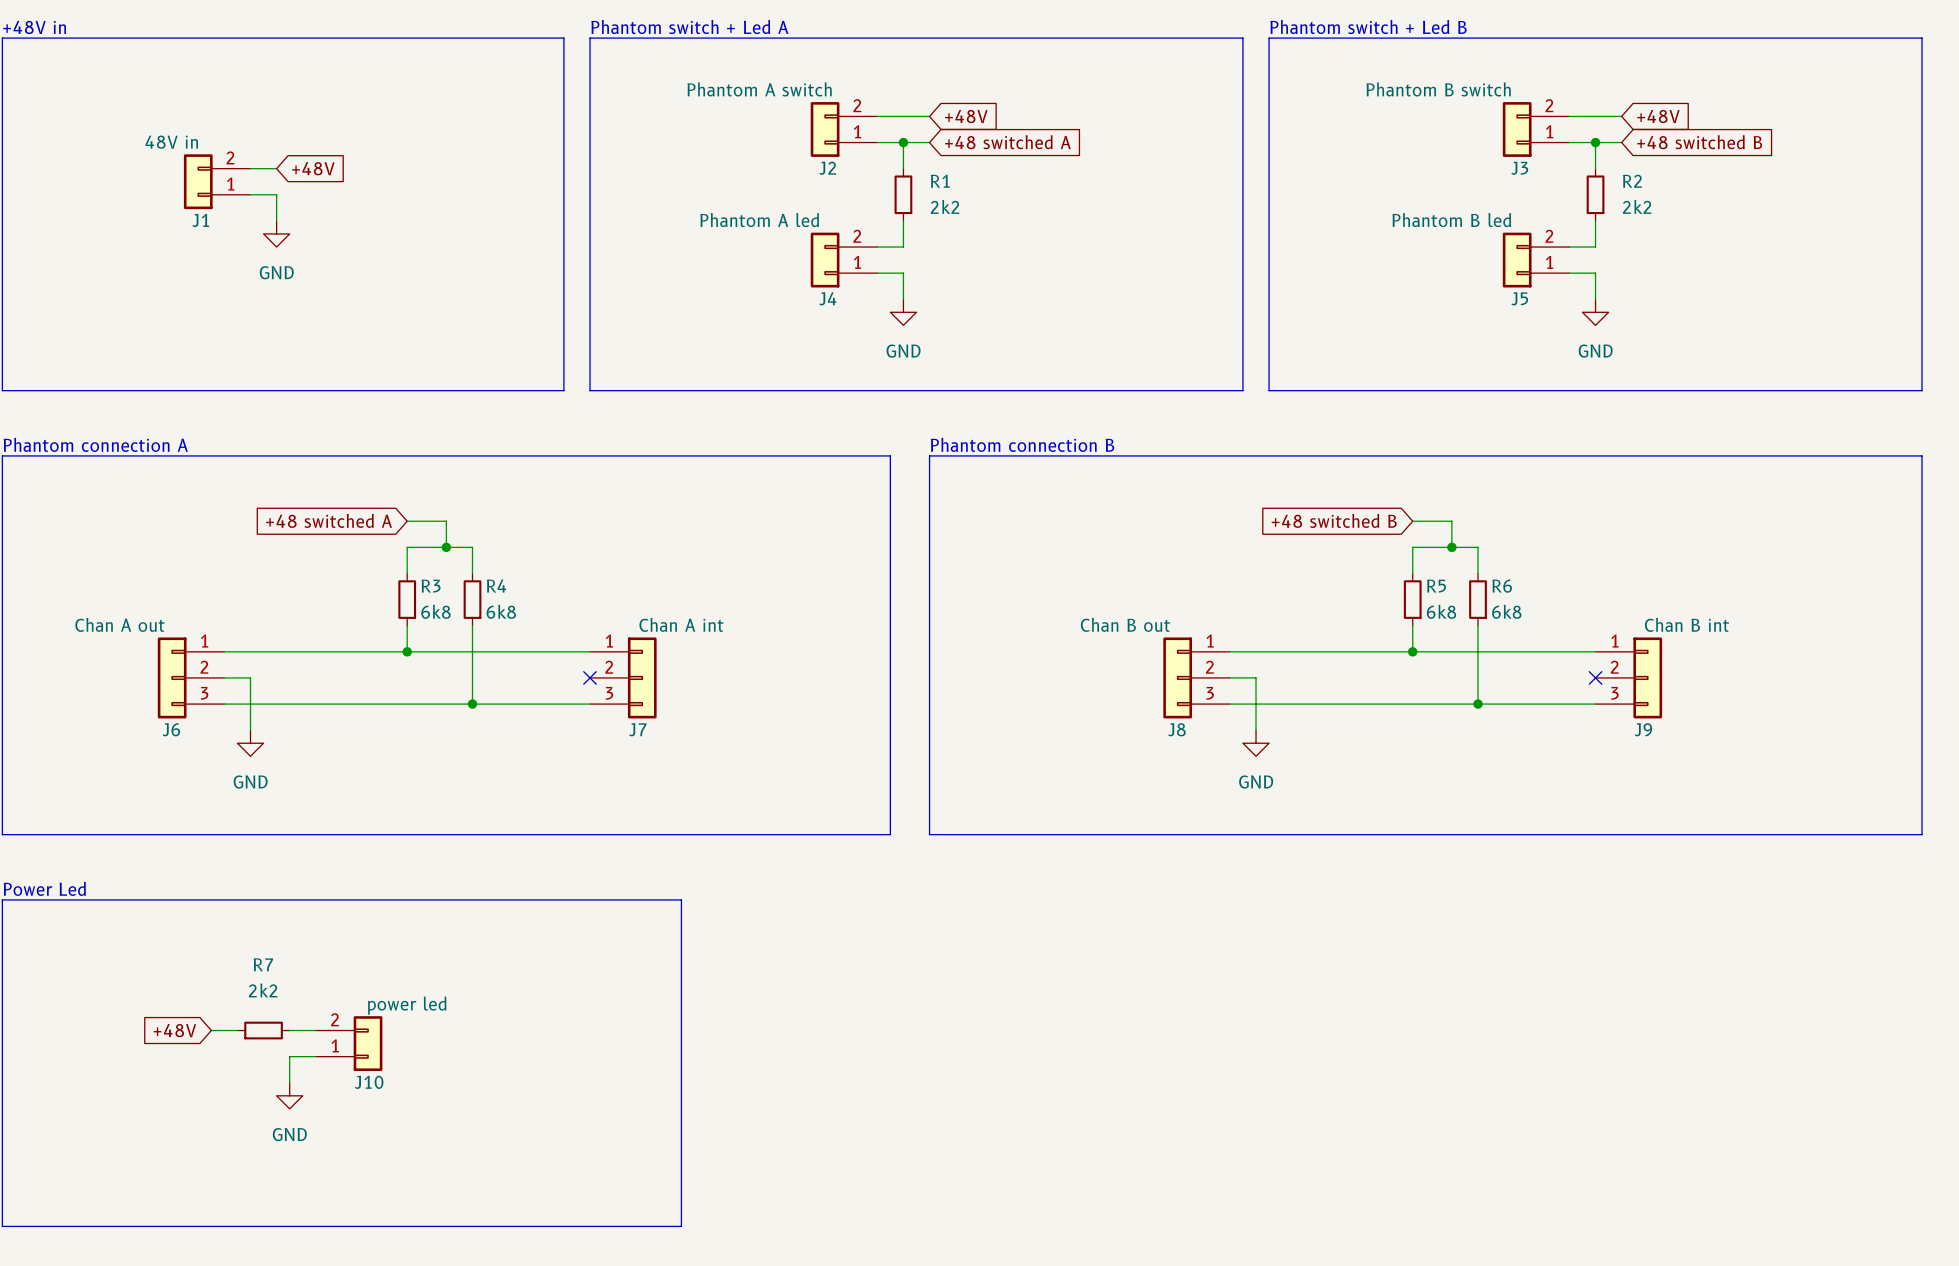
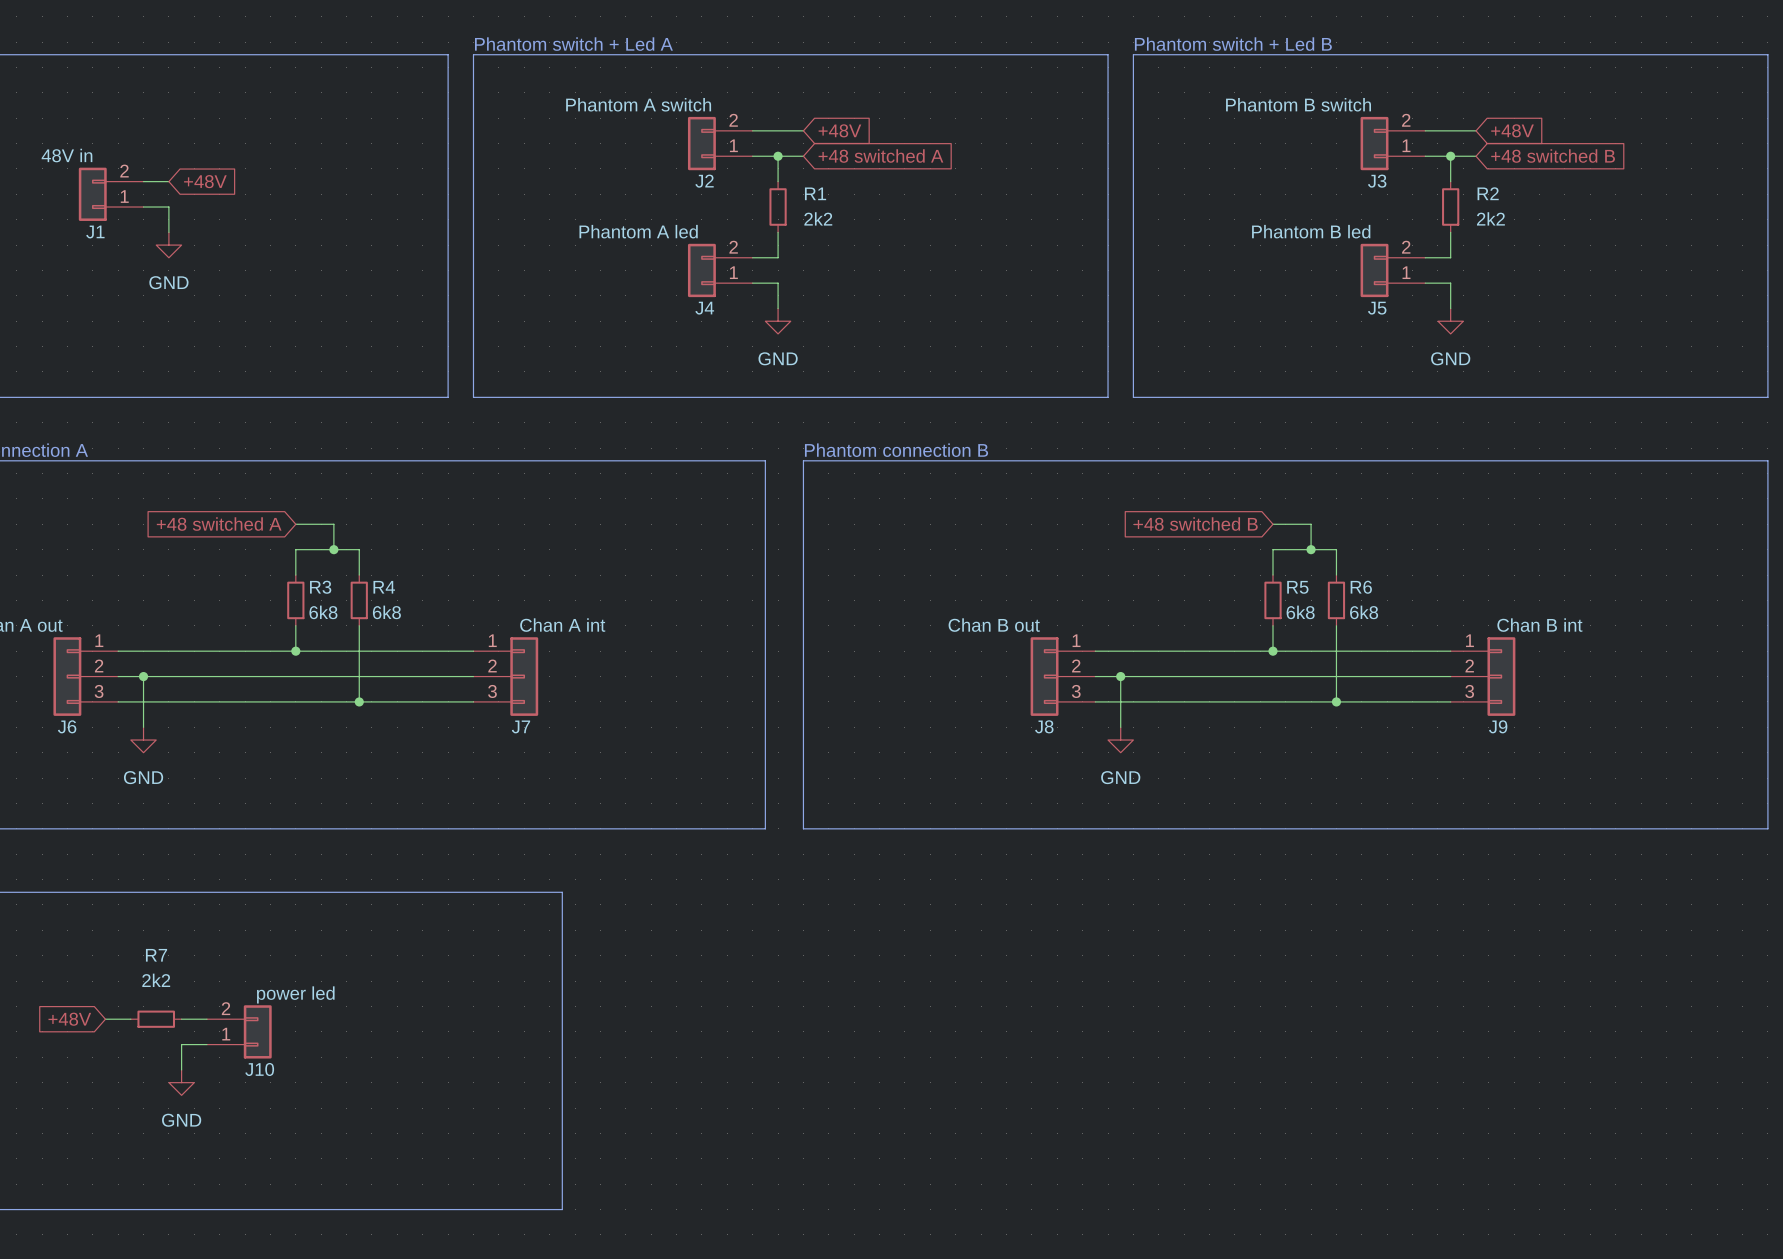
wire: none -> (143, 676) (473, 676)
junction: none -> (143, 676)
no-connect mark: (590, 677) -> none
wire: none -> (1120, 676) (1450, 676)
junction: none -> (1120, 676)
no-connect mark: (1595, 677) -> none

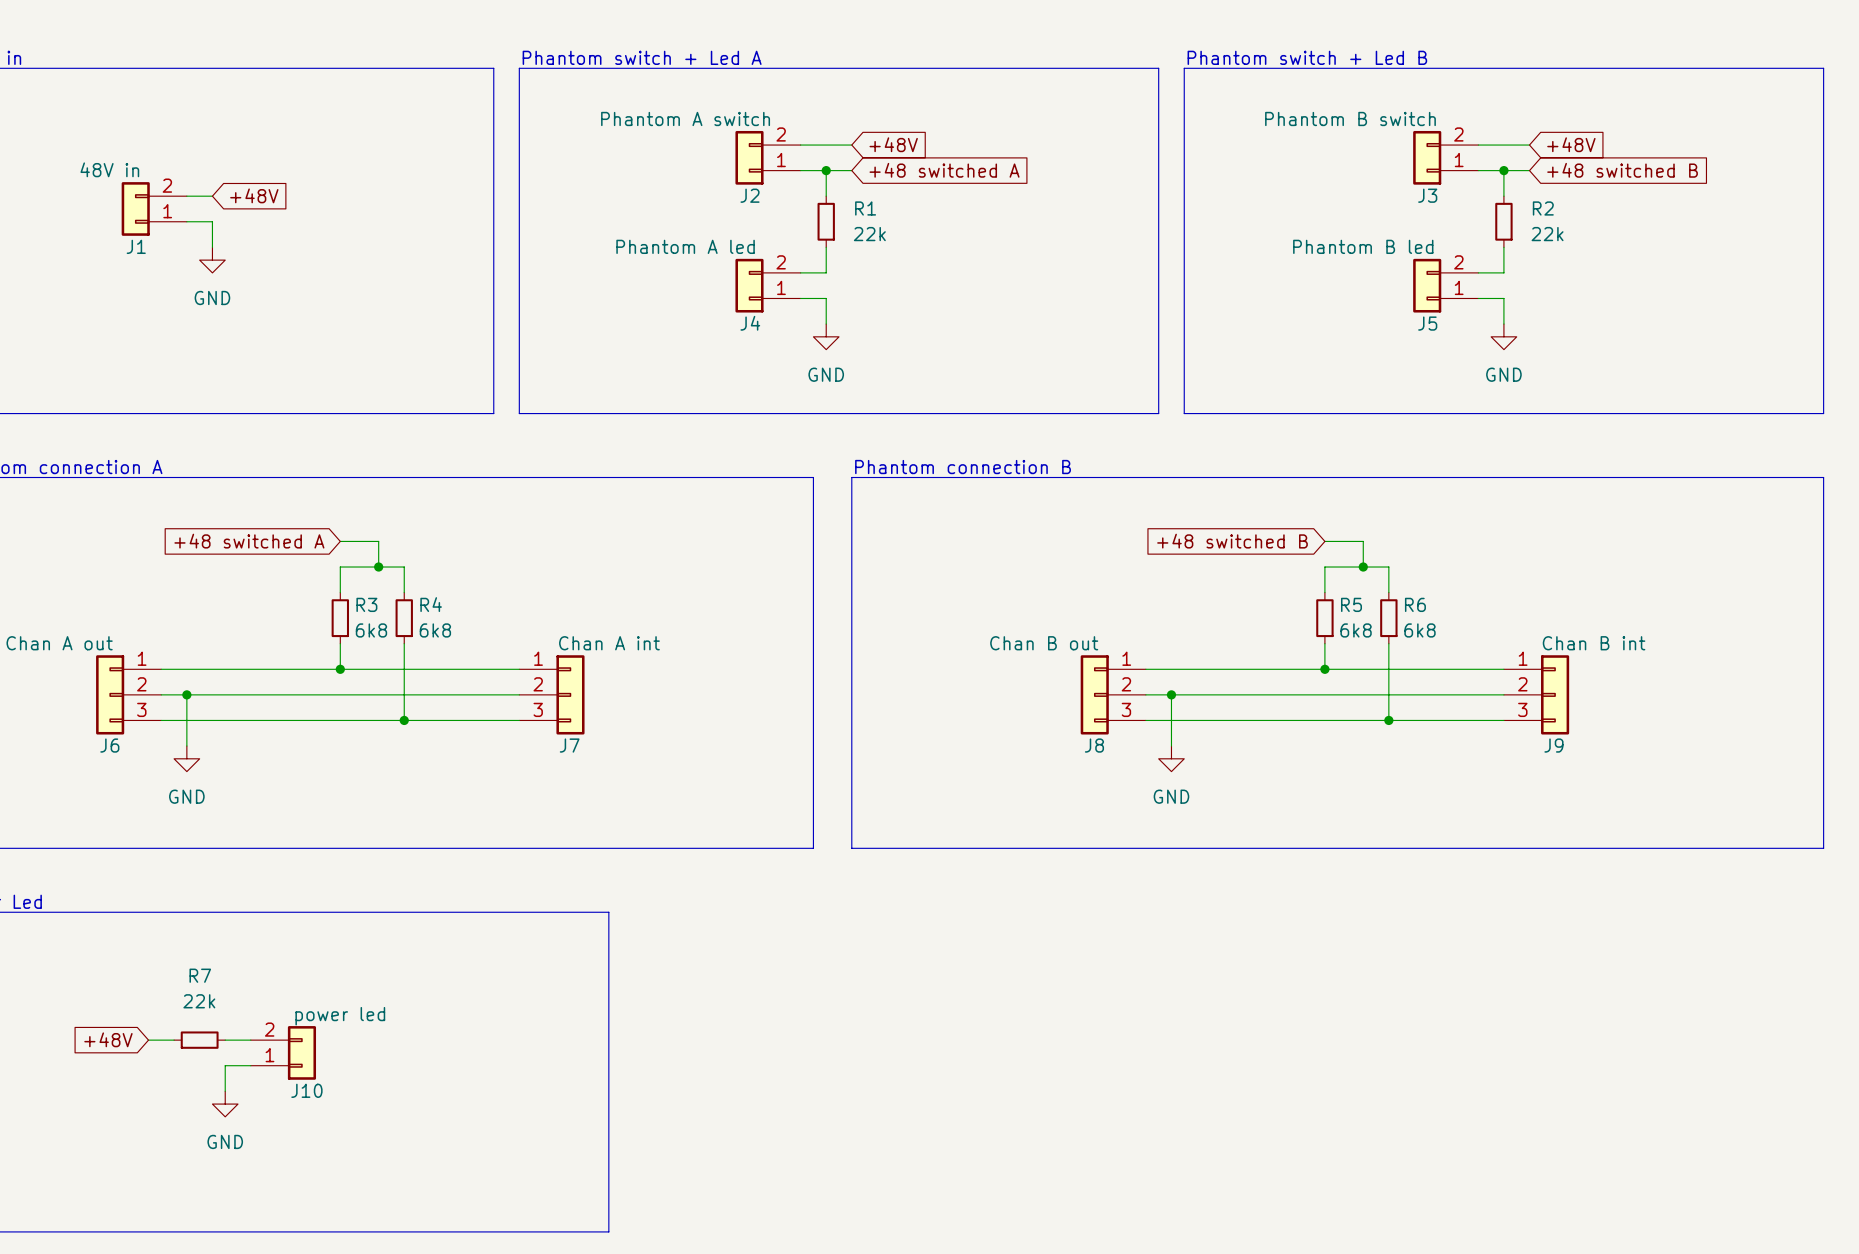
R1 value: 2k2 (818, 218) -> 22k (869, 234)
R2 value: 2k2 (1490, 218) -> 22k (1547, 234)
R7 value: 2k2 (156, 980) -> 22k (199, 1001)

